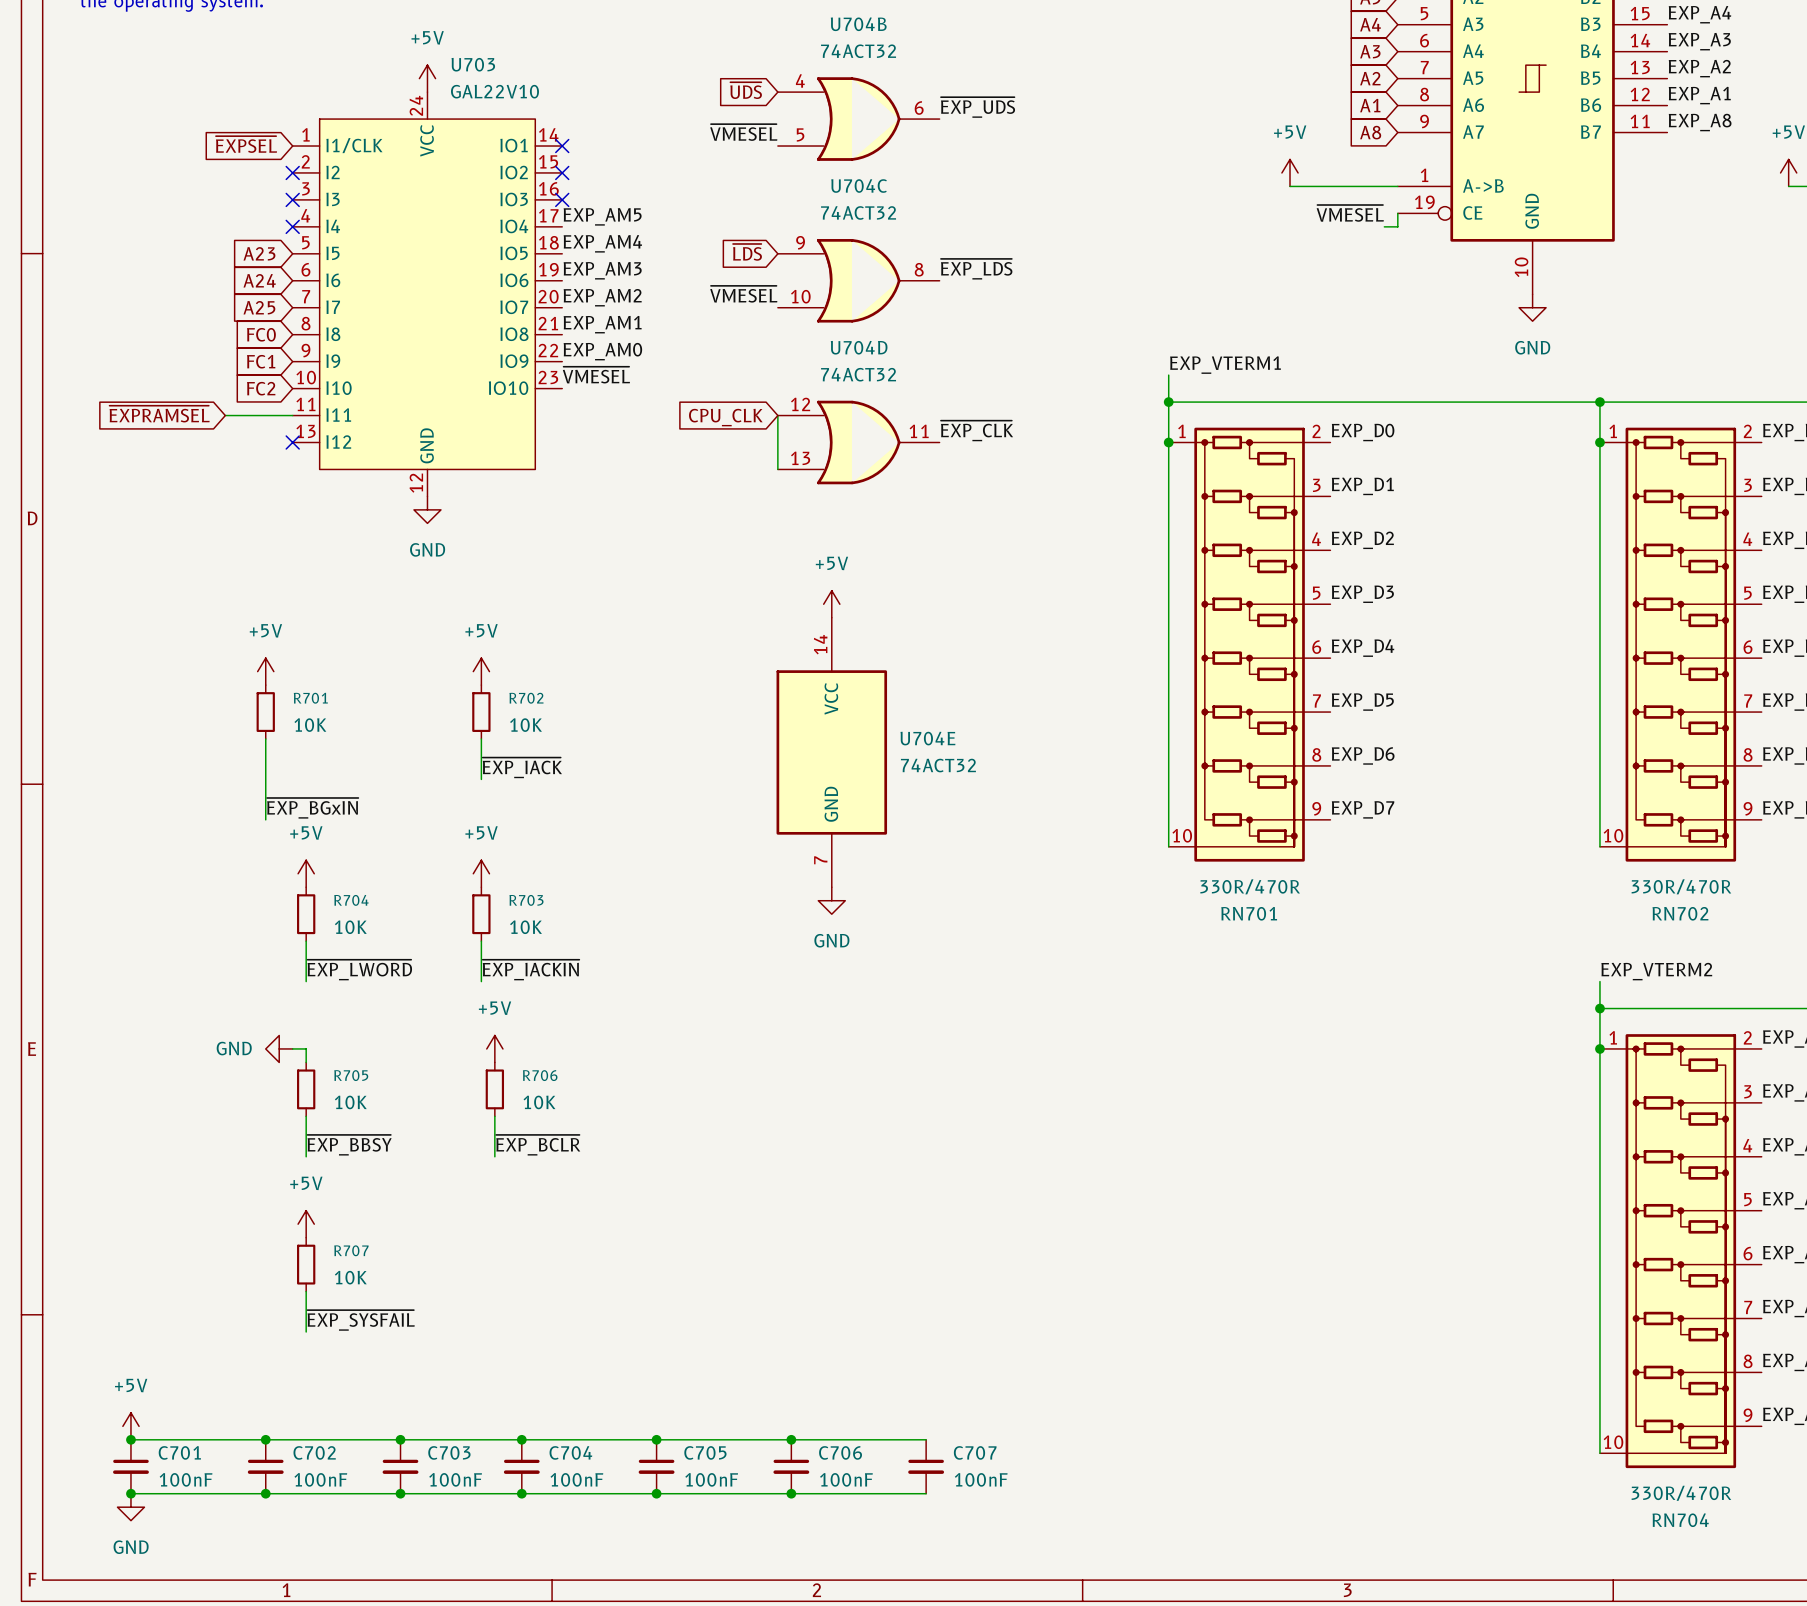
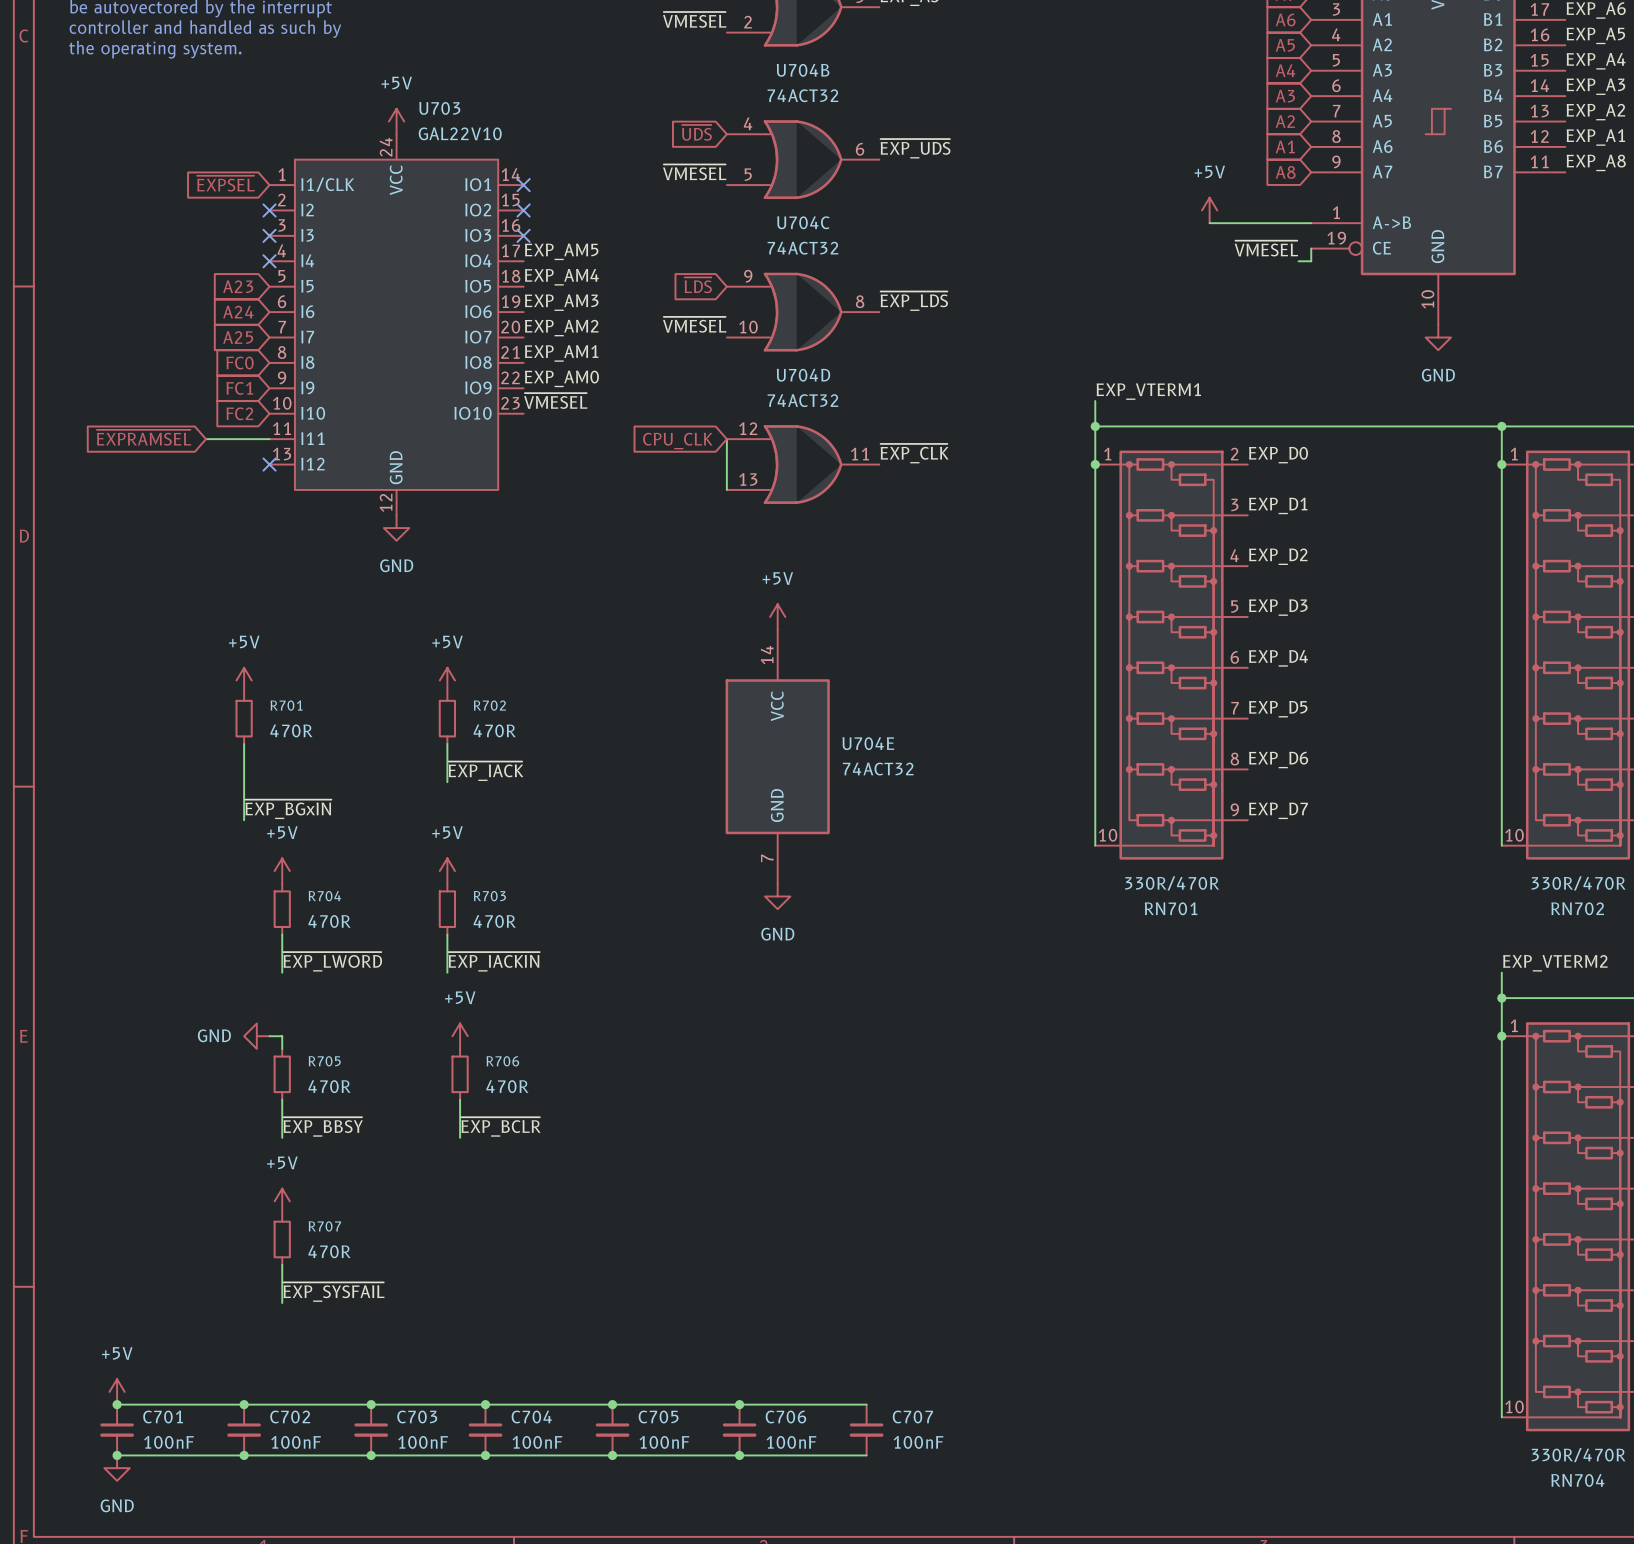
R701 value: 10K (310, 725) -> 470R (291, 730)
R702 value: 10K (526, 725) -> 470R (494, 730)
R704 value: 10K (350, 927) -> 470R (329, 921)
R703 value: 10K (526, 927) -> 470R (494, 921)
R705 value: 10K (350, 1102) -> 470R (329, 1086)
R706 value: 10K (539, 1102) -> 470R (507, 1086)
R707 value: 10K (350, 1277) -> 470R (329, 1251)

